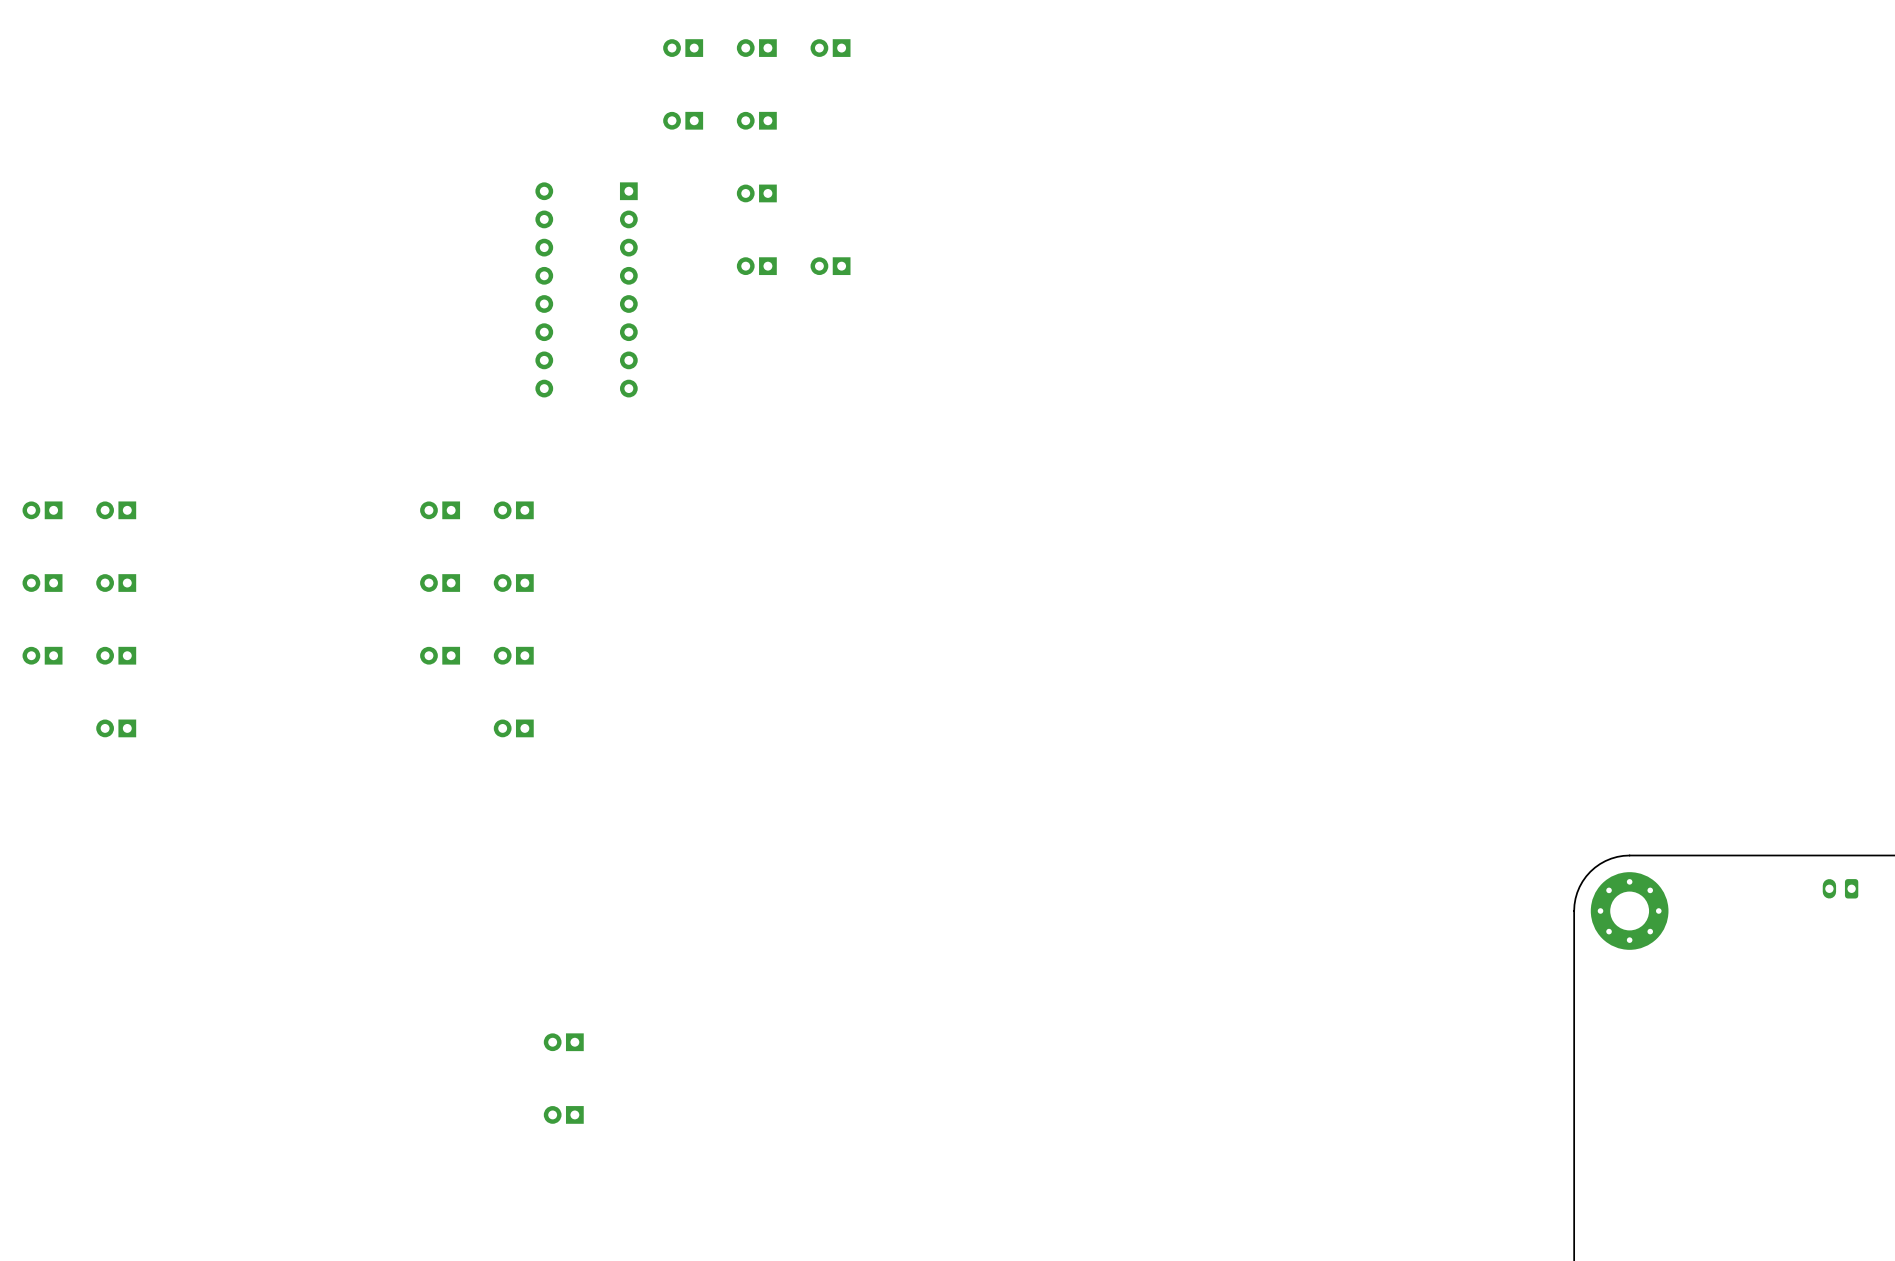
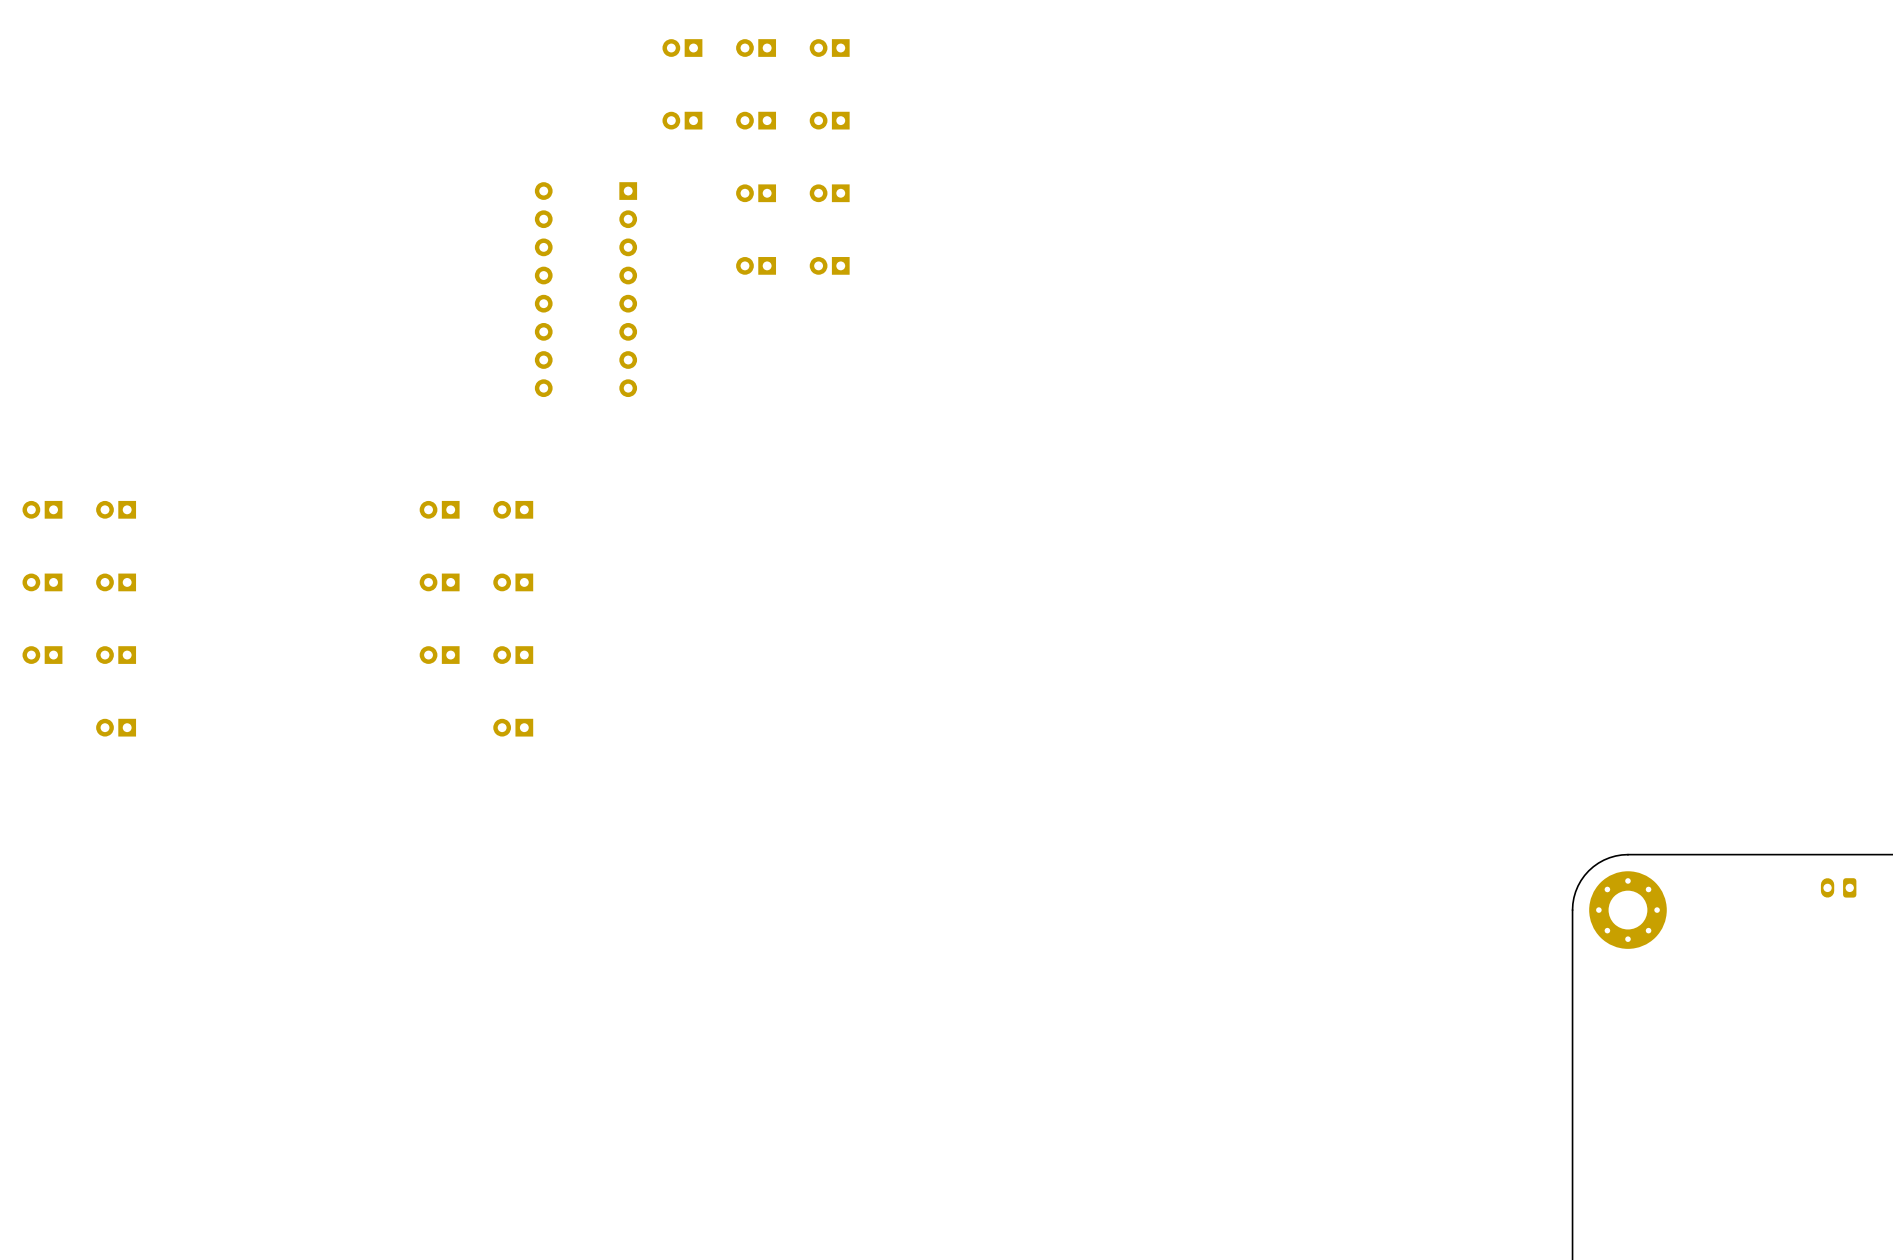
part: none -> (829, 120)
part: none -> (829, 193)
part: (563, 1042) -> none
part: (563, 1114) -> none

